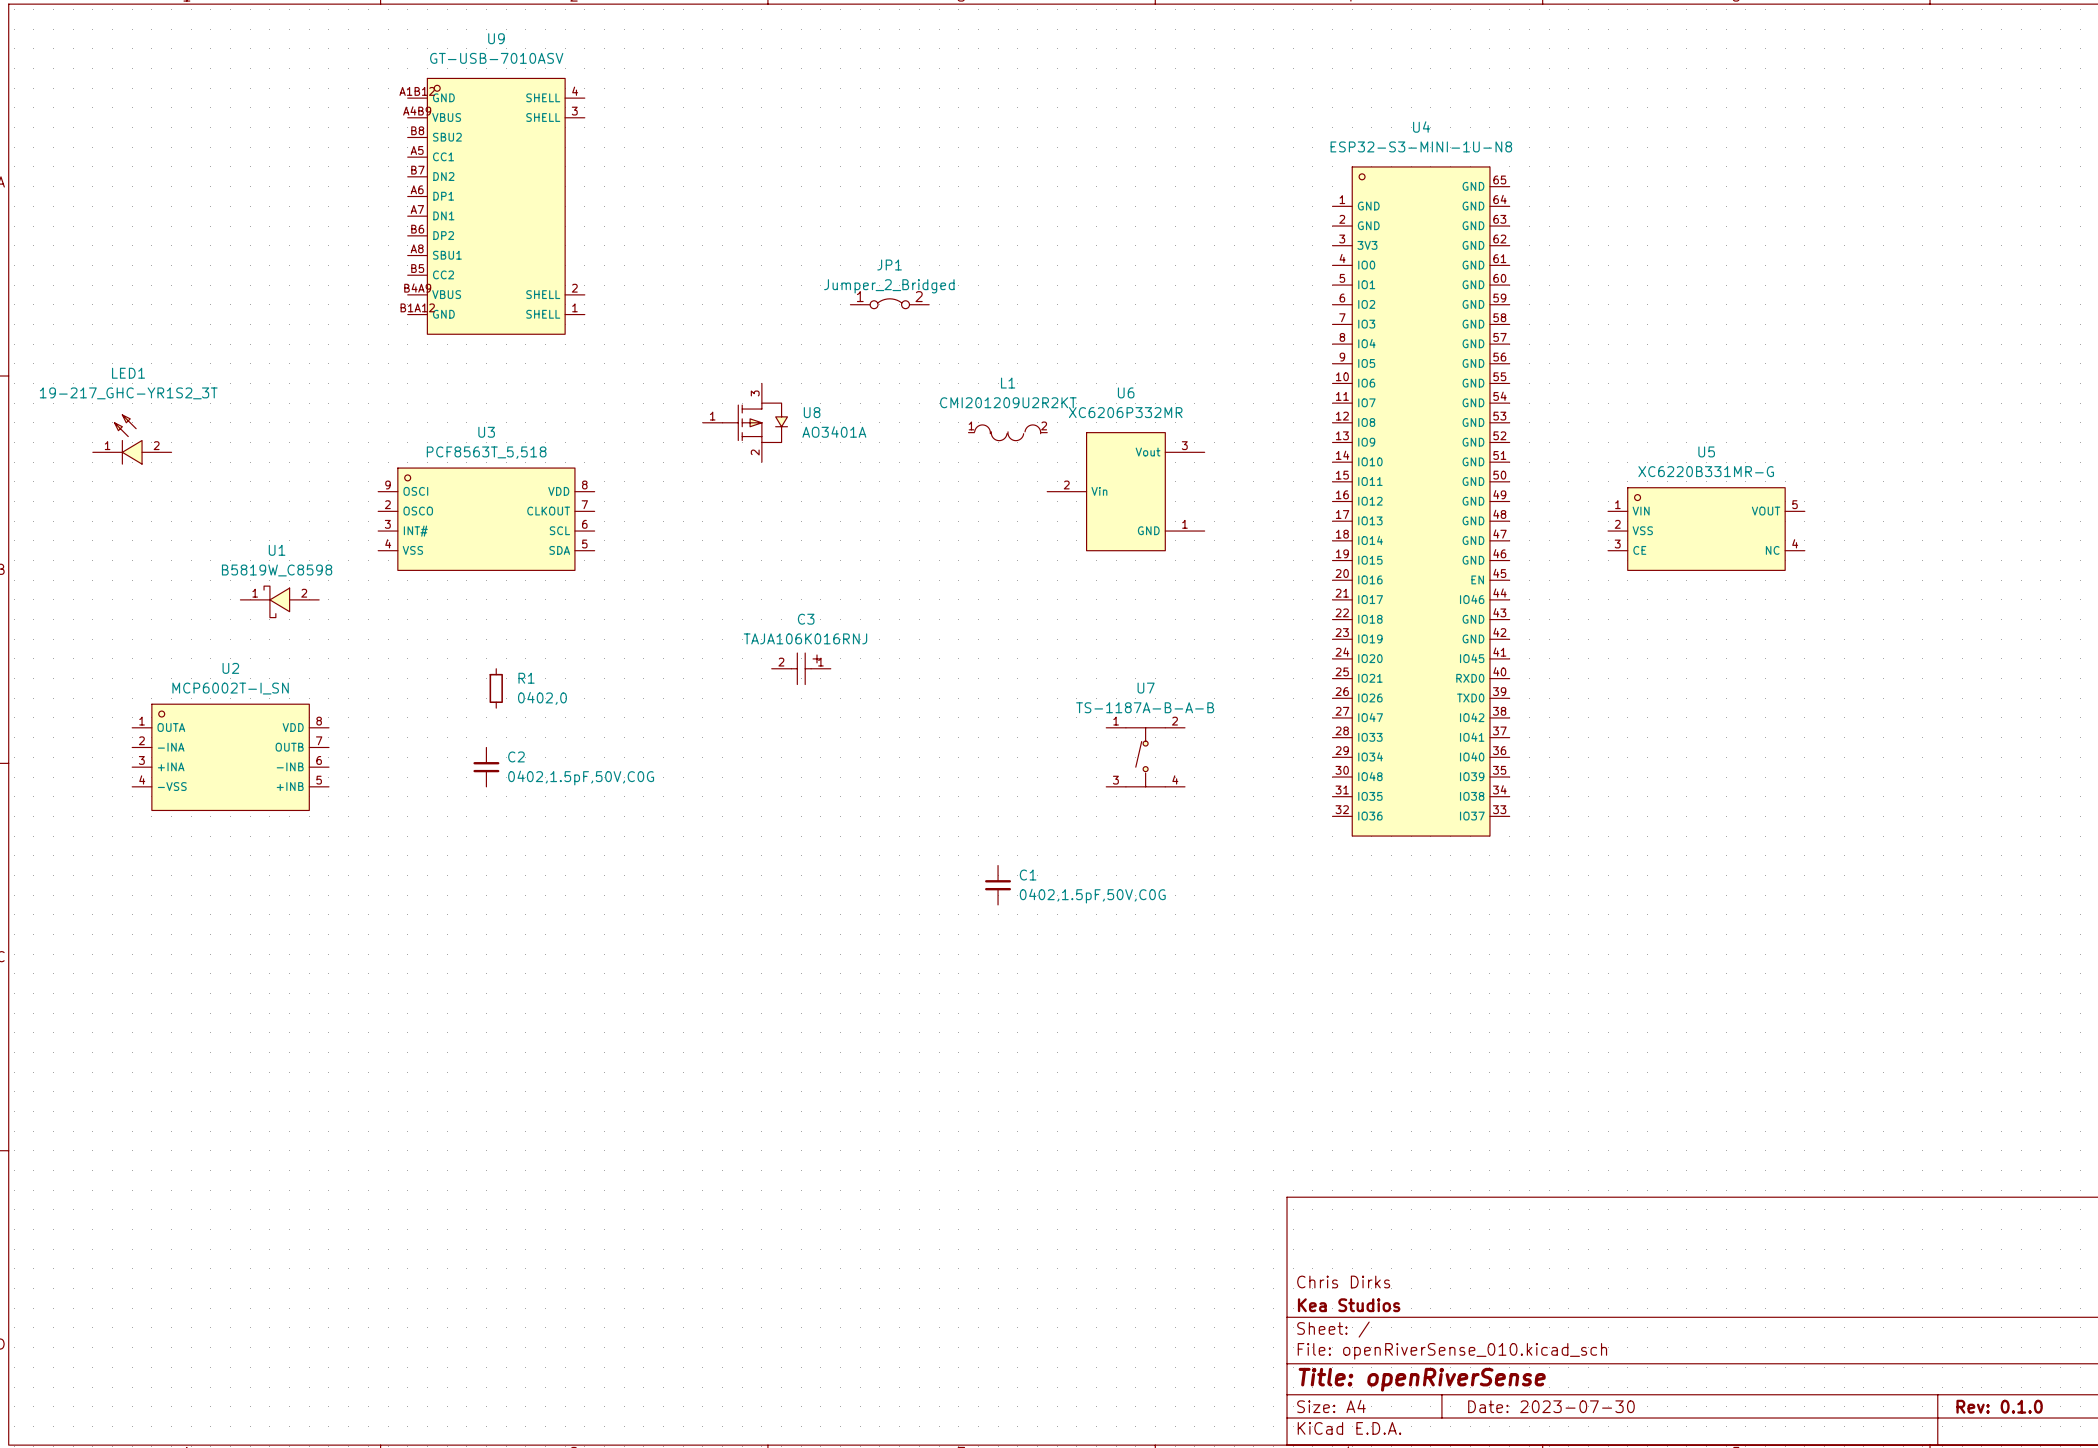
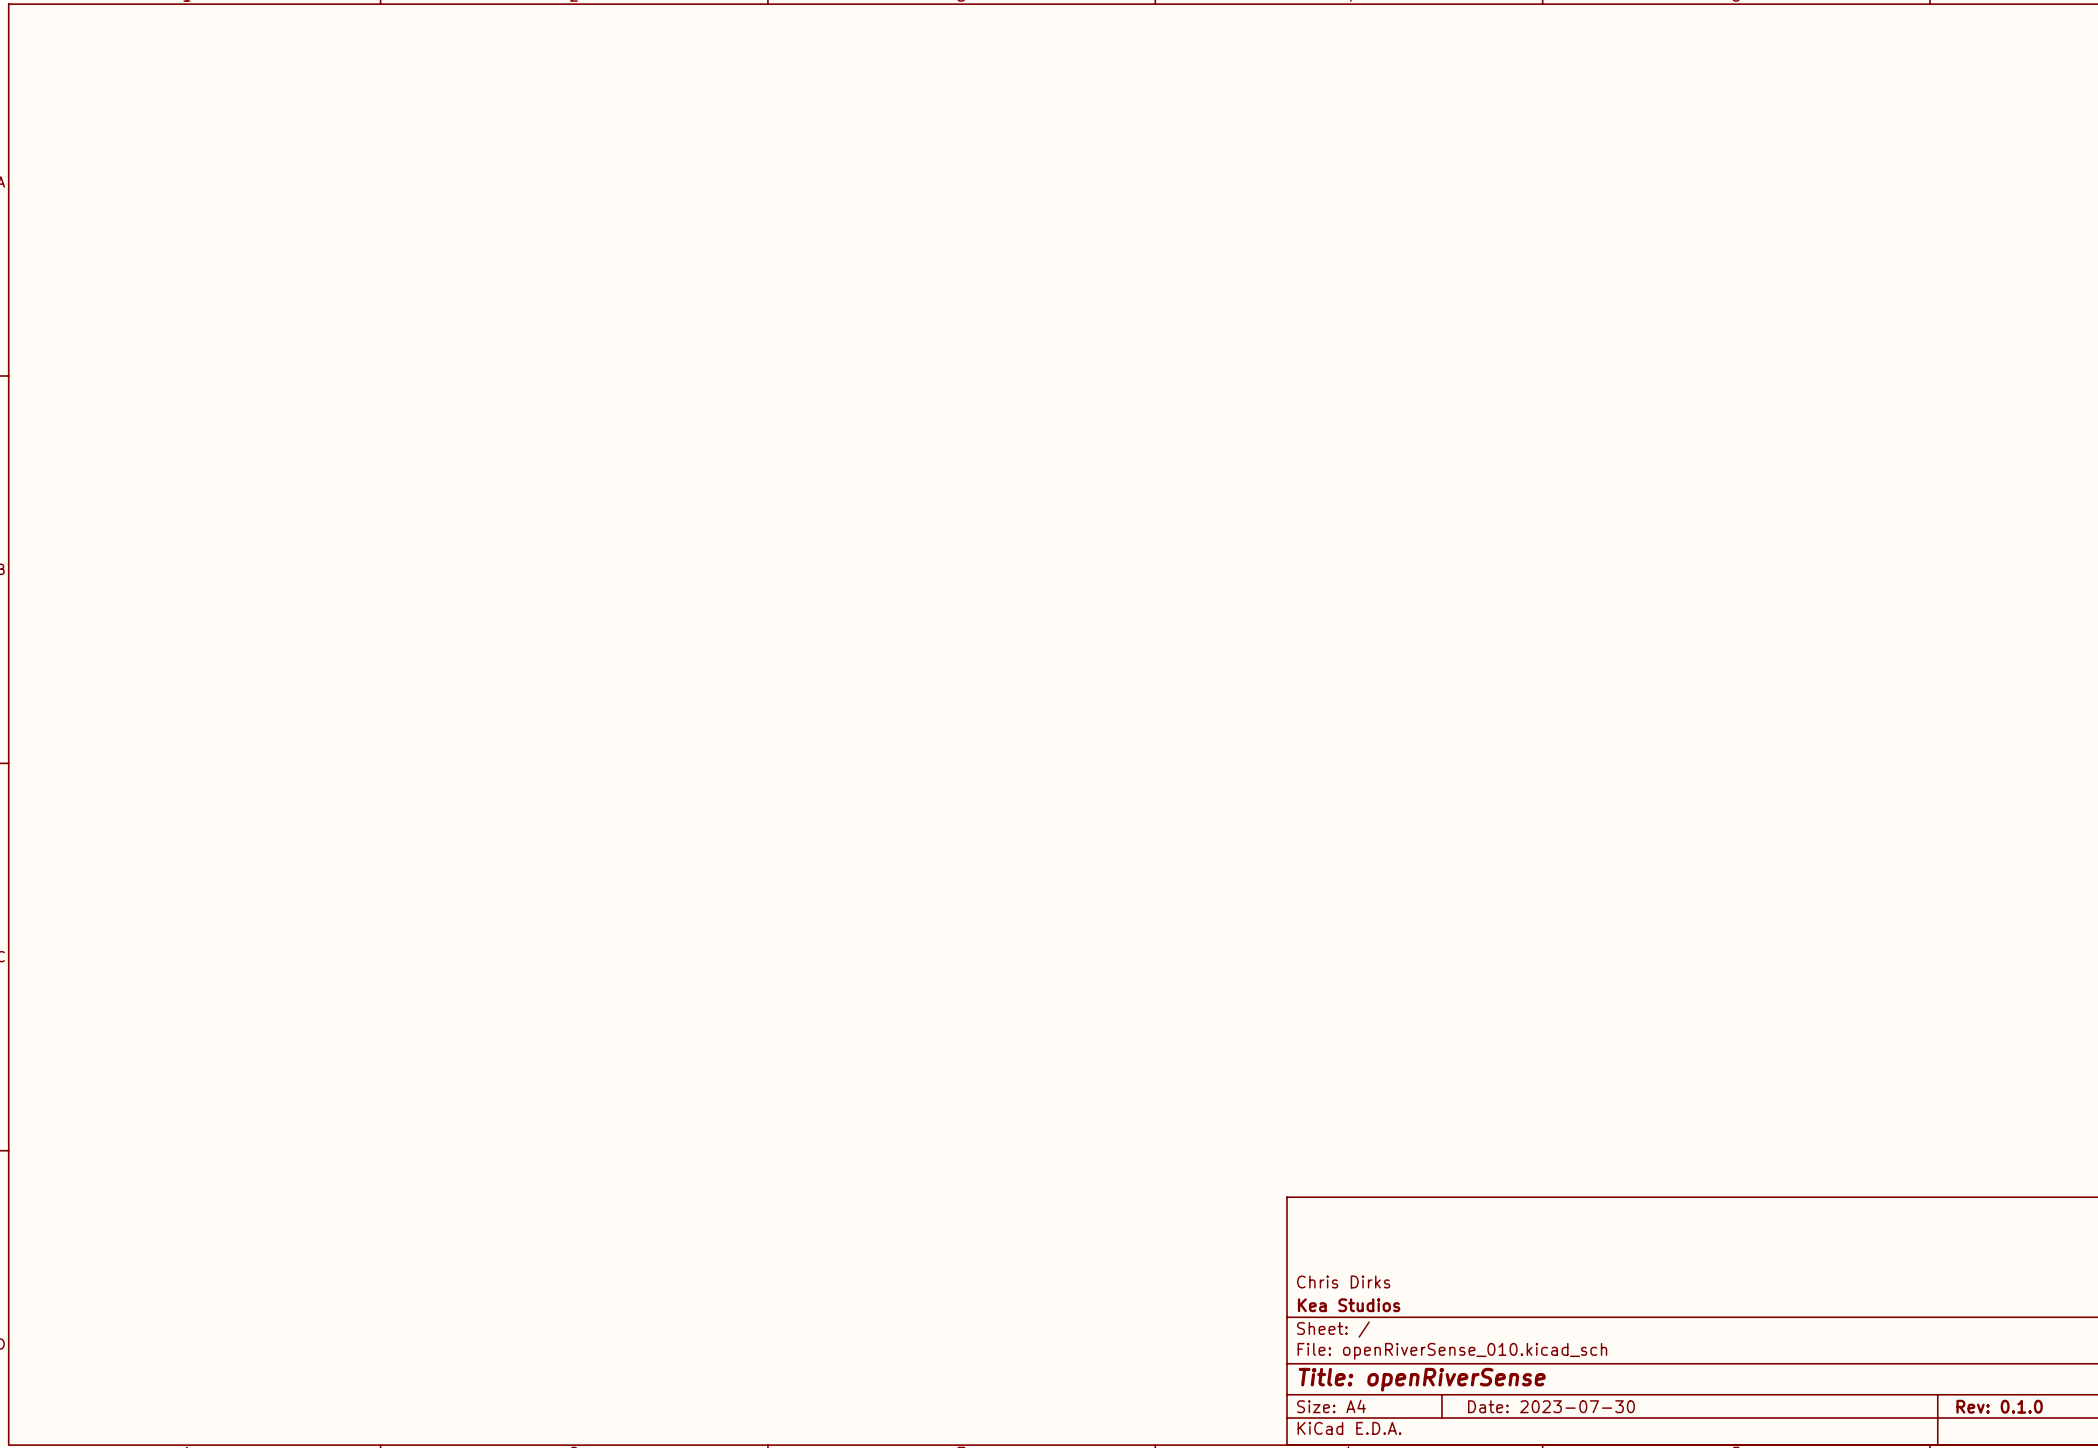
U9: GT-USB-7010ASV (496, 206) -> none
JP1: Jumper_2_Bridged (889, 303) -> none
U8: AO3401A (745, 422) -> none
L1: CMI201209U2R2KT (1007, 432) -> none
LED1: 19-217_GHC-YR1S2_3T (132, 439) -> none
U6: XC6206P332MR (1125, 491) -> none
U4: ESP32-S3-MINI-1U-N8 (1421, 501) -> none
U3: PCF8563T_5,518 (486, 519) -> none
U5: XC6220B331MR-G (1706, 529) -> none
U1: B5819W_C8598 (279, 601) -> none
C3: TAJA106K016RNJ (801, 668) -> none
R1: 0402,0 (496, 688) -> none
U2: MCP6002T-I_SN (230, 757) -> none
U7: TS-1187A-B-A-B (1145, 757) -> none
C2: 0402,1.5pF,50V,C0G (486, 767) -> none
C1: 0402,1.5pF,50V,C0G (998, 885) -> none

